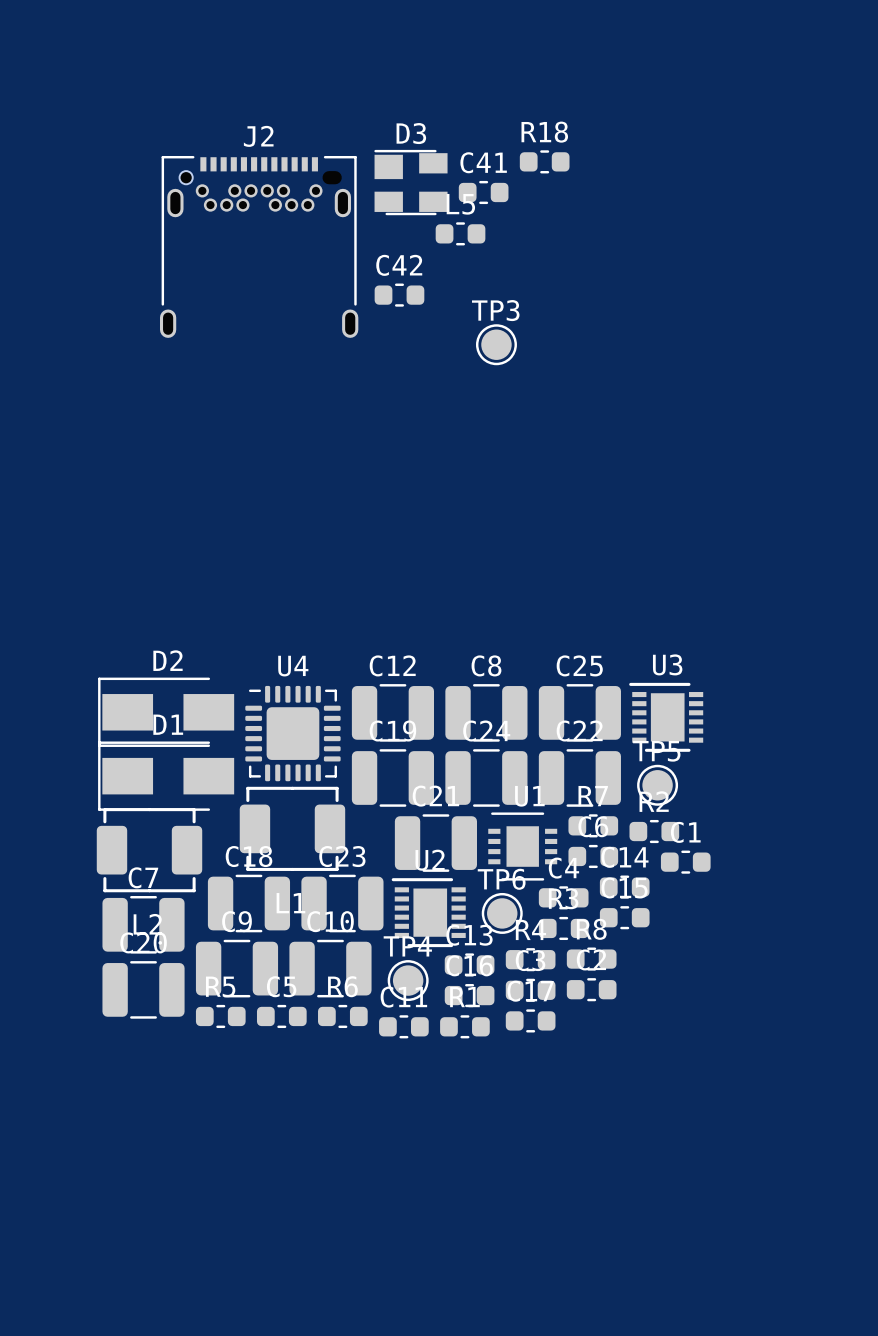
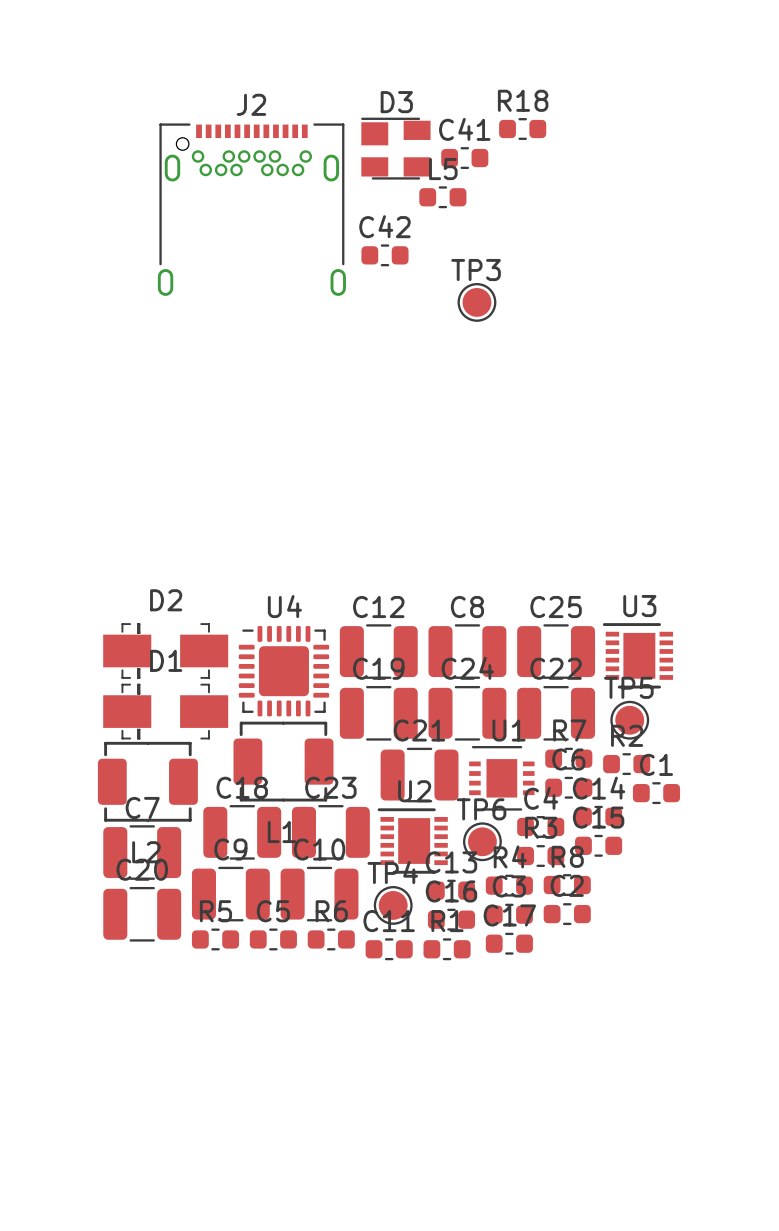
D2 footprint: [98, 677, 235, 747] -> [103, 623, 229, 679]
D1 footprint: [98, 741, 235, 811] -> [103, 683, 229, 740]

